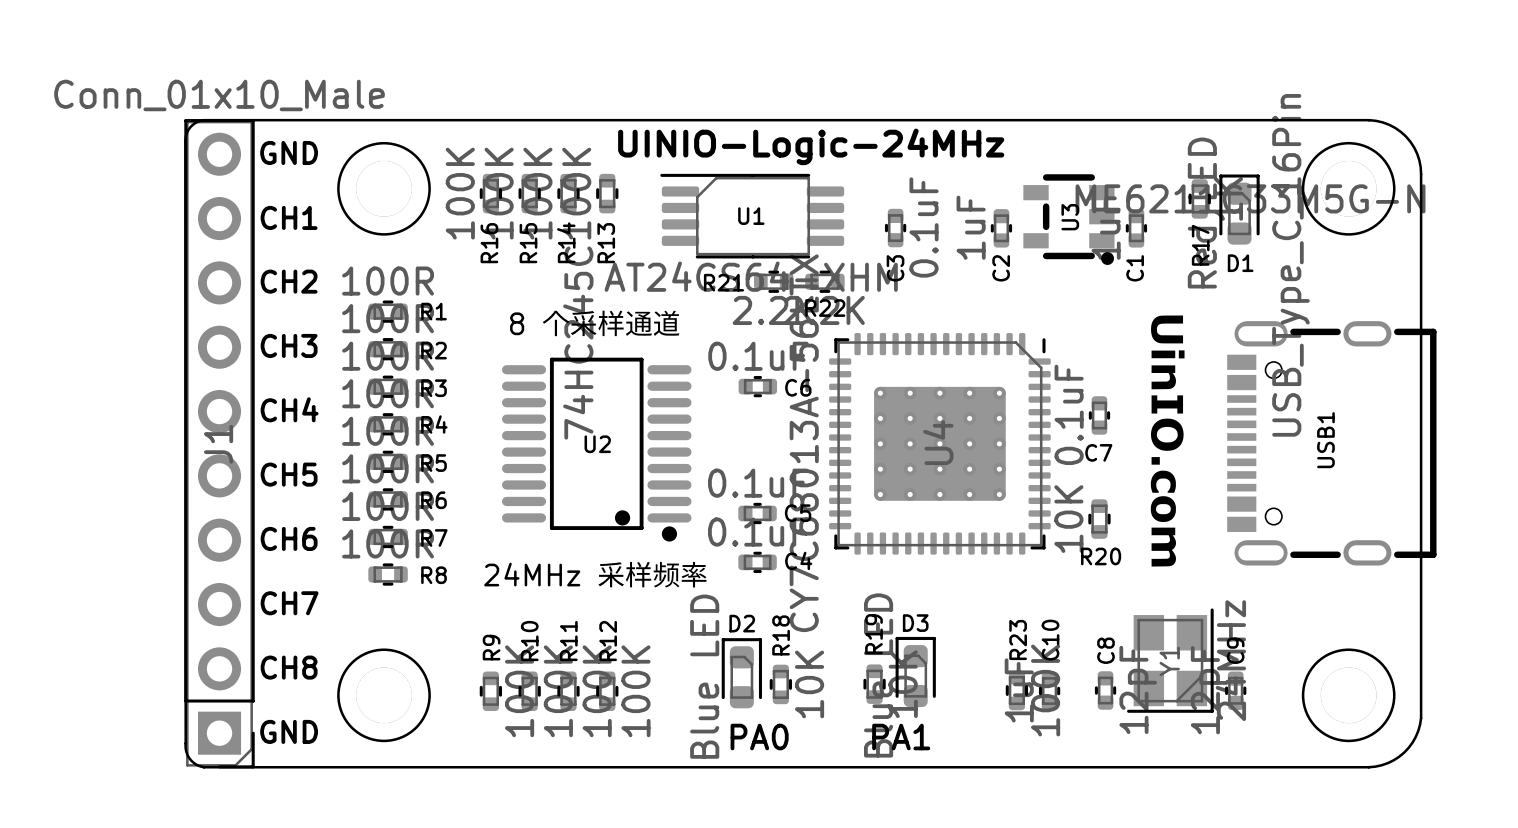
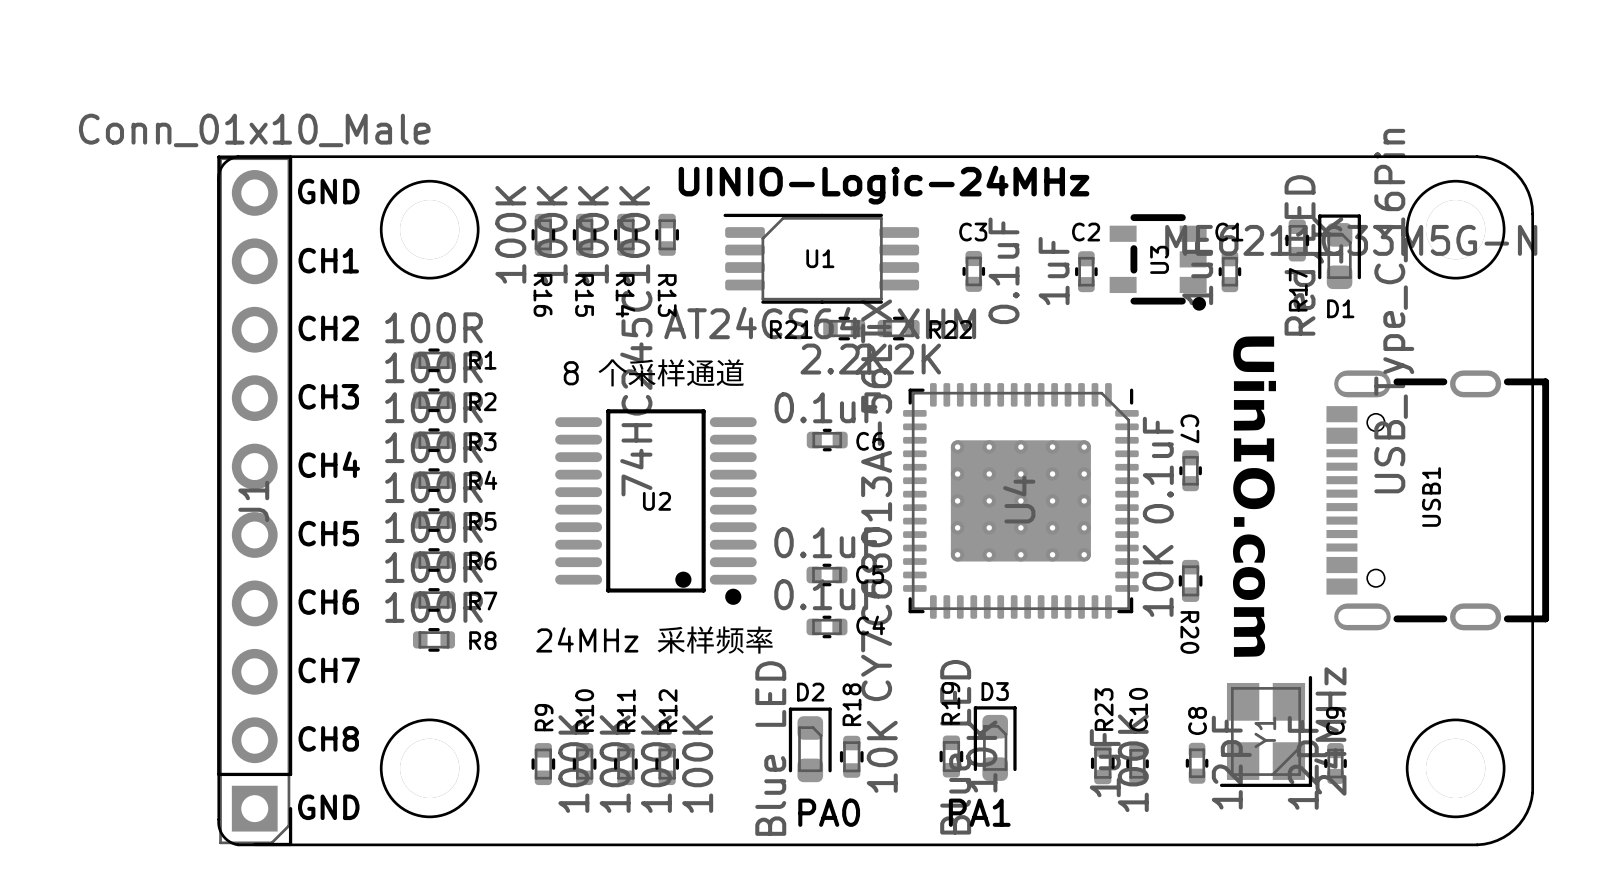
R14 name rotation: 0° (566, 242) -> 180° (625, 295)
R16 name rotation: 0° (489, 243) -> 180° (543, 295)
R15 name rotation: 0° (528, 243) -> 180° (584, 295)
R13 name rotation: 0° (606, 243) -> 180° (667, 295)
C3 name rotation: 0° (895, 268) -> 90° clockwise (973, 232)
C3 name position: C3 (895, 268) -> C3 (973, 232)
C2 name rotation: 0° (1001, 268) -> 90° clockwise (1086, 232)
C2 name position: C2 (1001, 268) -> C2 (1086, 232)
C1 name rotation: 0° (1135, 268) -> 90° clockwise (1229, 232)
C1 name position: C1 (1135, 268) -> C1 (1229, 232)
R22 name position: R22 (825, 308) -> R22 (950, 329)
drawing shape: [1150, 315, 1185, 567] -> [1232, 336, 1277, 657]
C7 name rotation: 0° (1098, 452) -> 90° clockwise (1189, 428)
C7 name position: C7 (1098, 452) -> C7 (1189, 428)
R20 name rotation: 0° (1101, 556) -> 90° clockwise (1189, 632)

